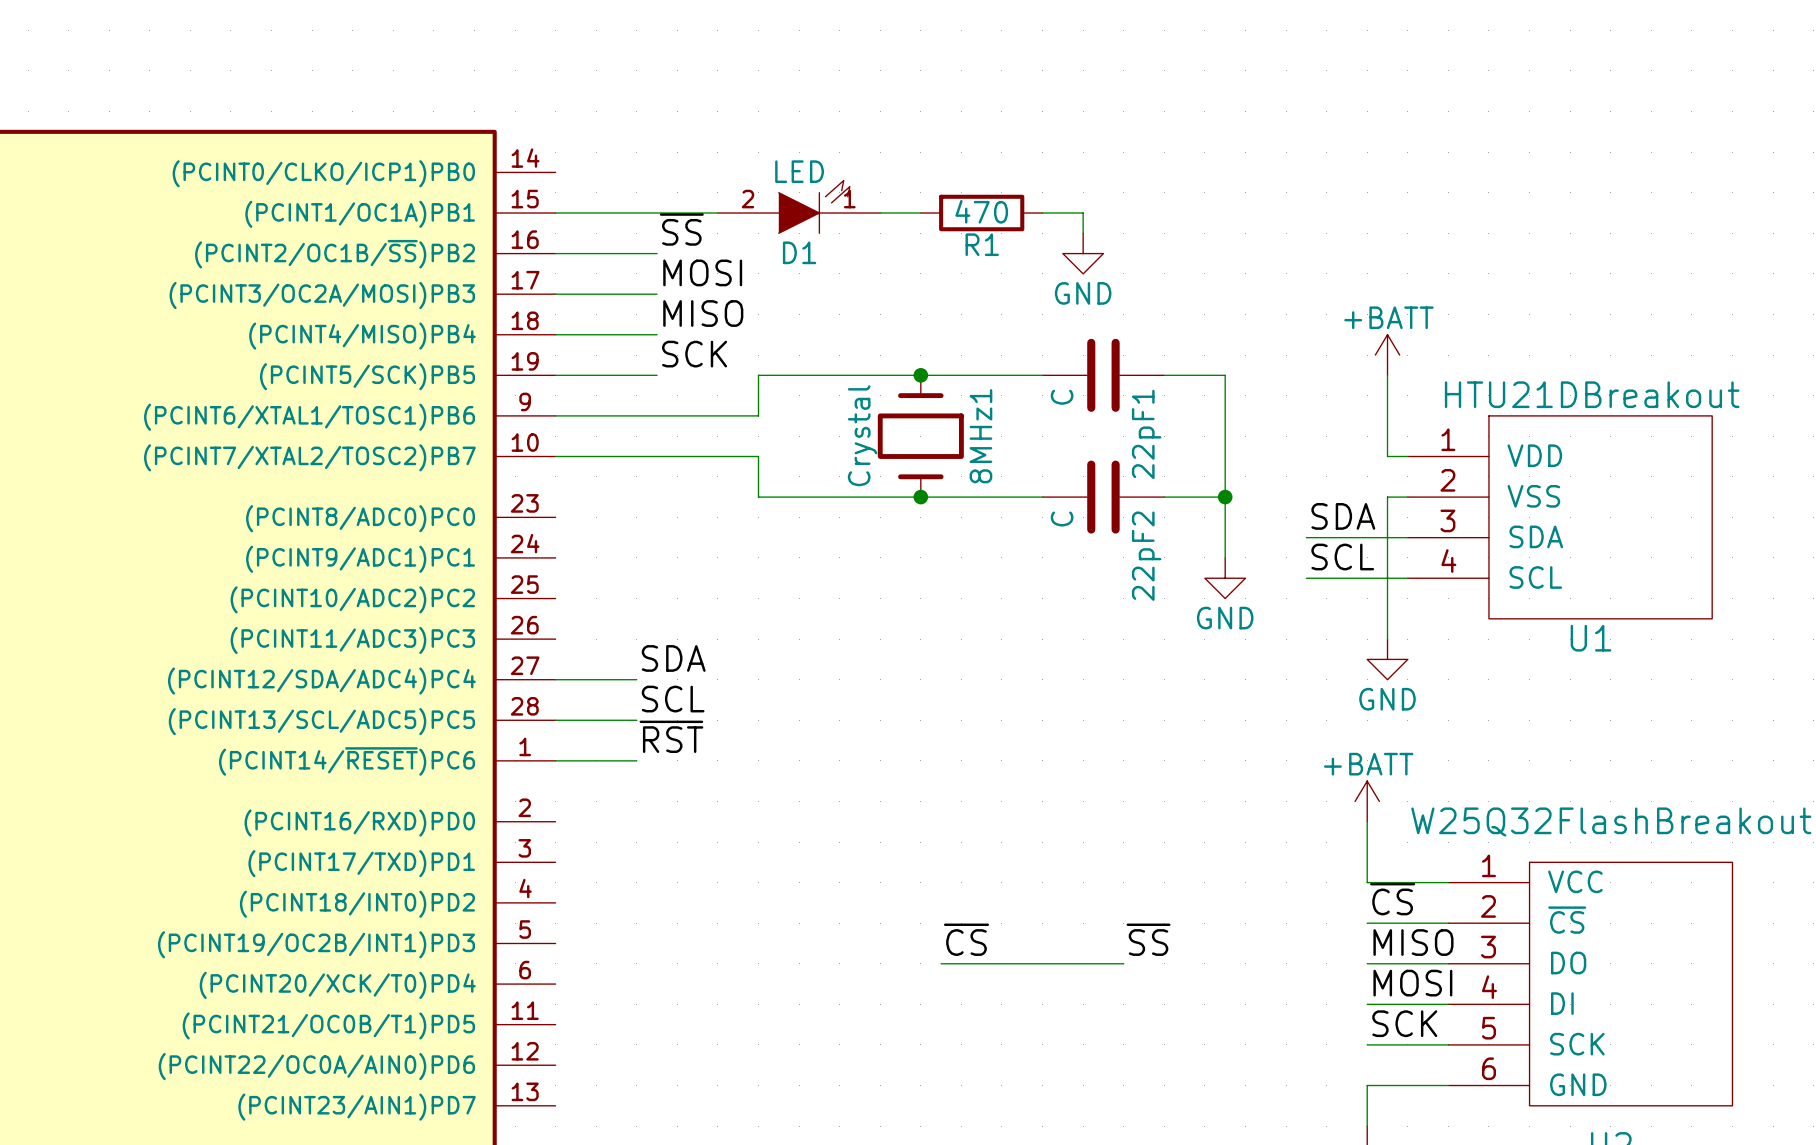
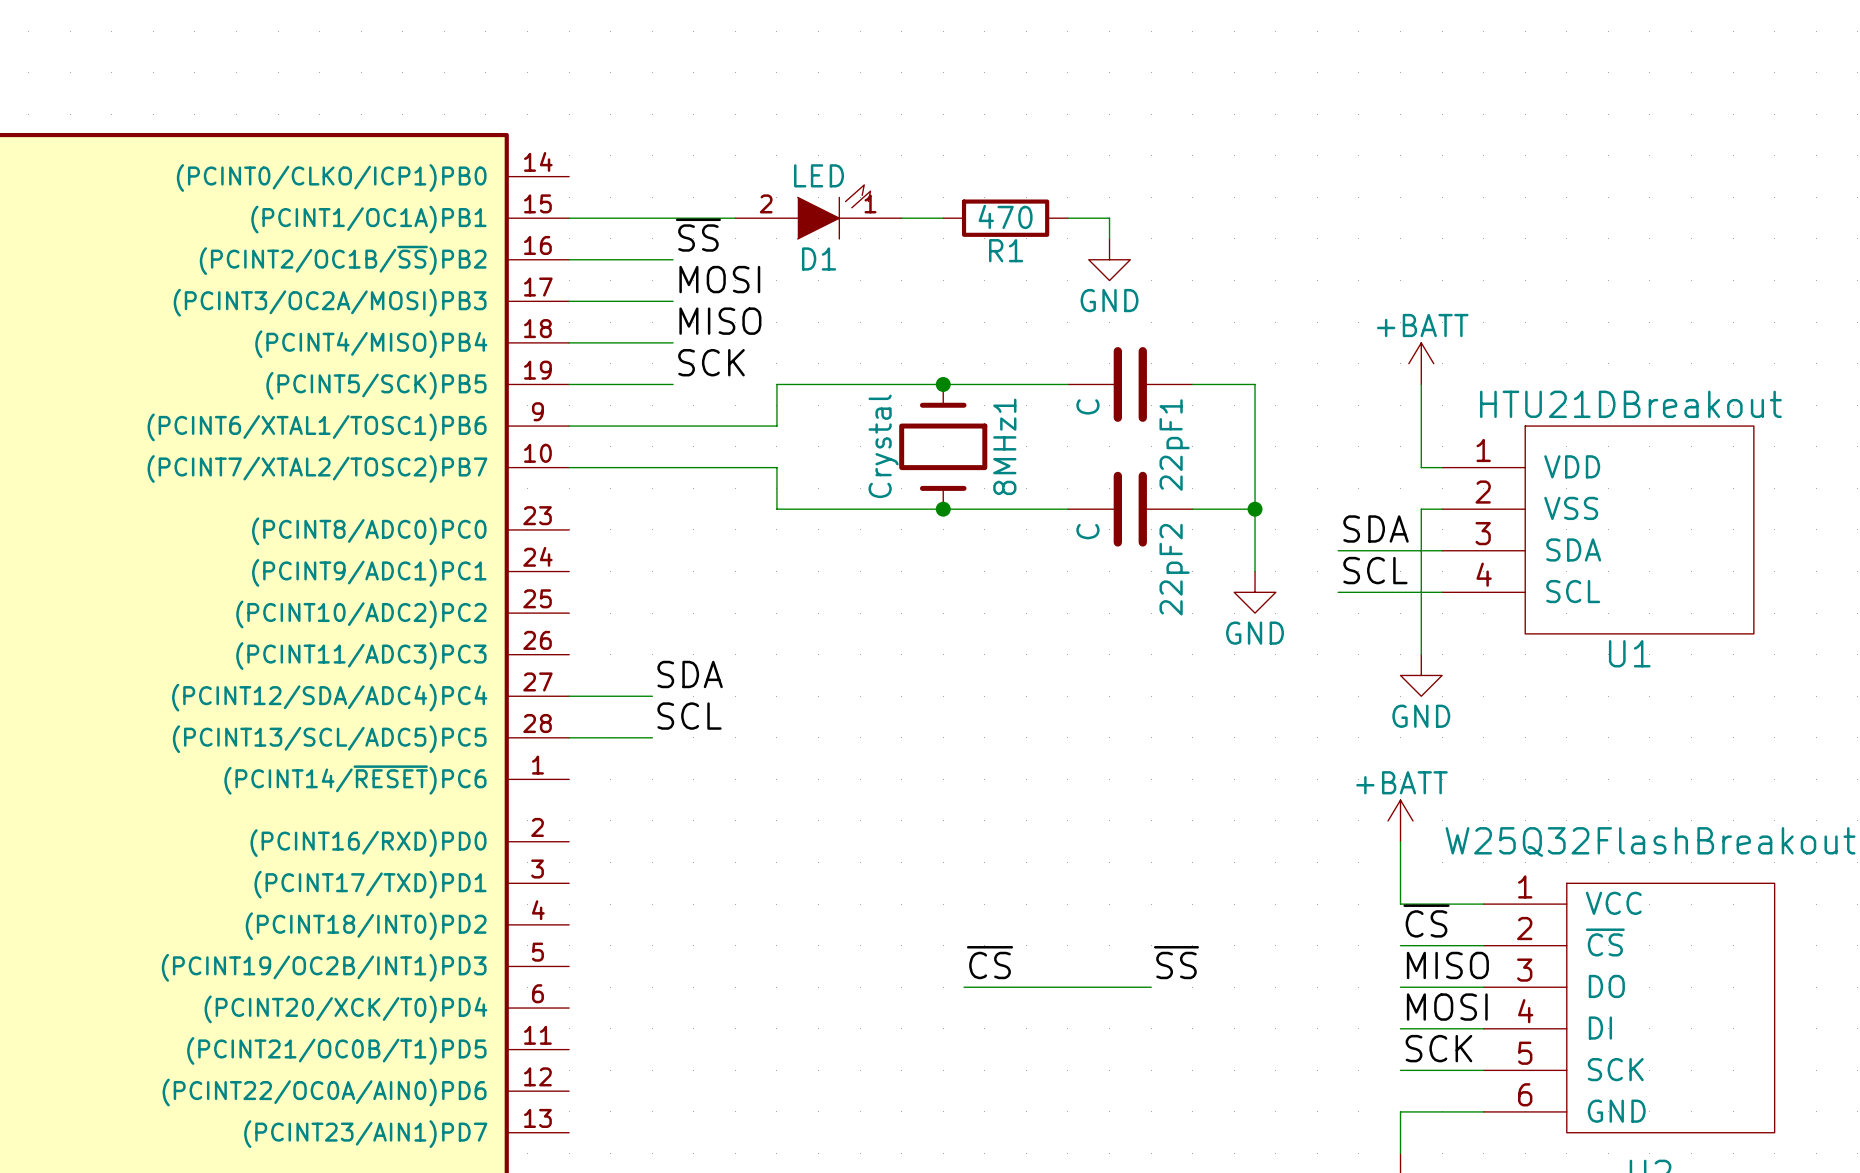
label: ~{RST} (671, 736) -> none
wire: (555, 760) (636, 760) -> none

